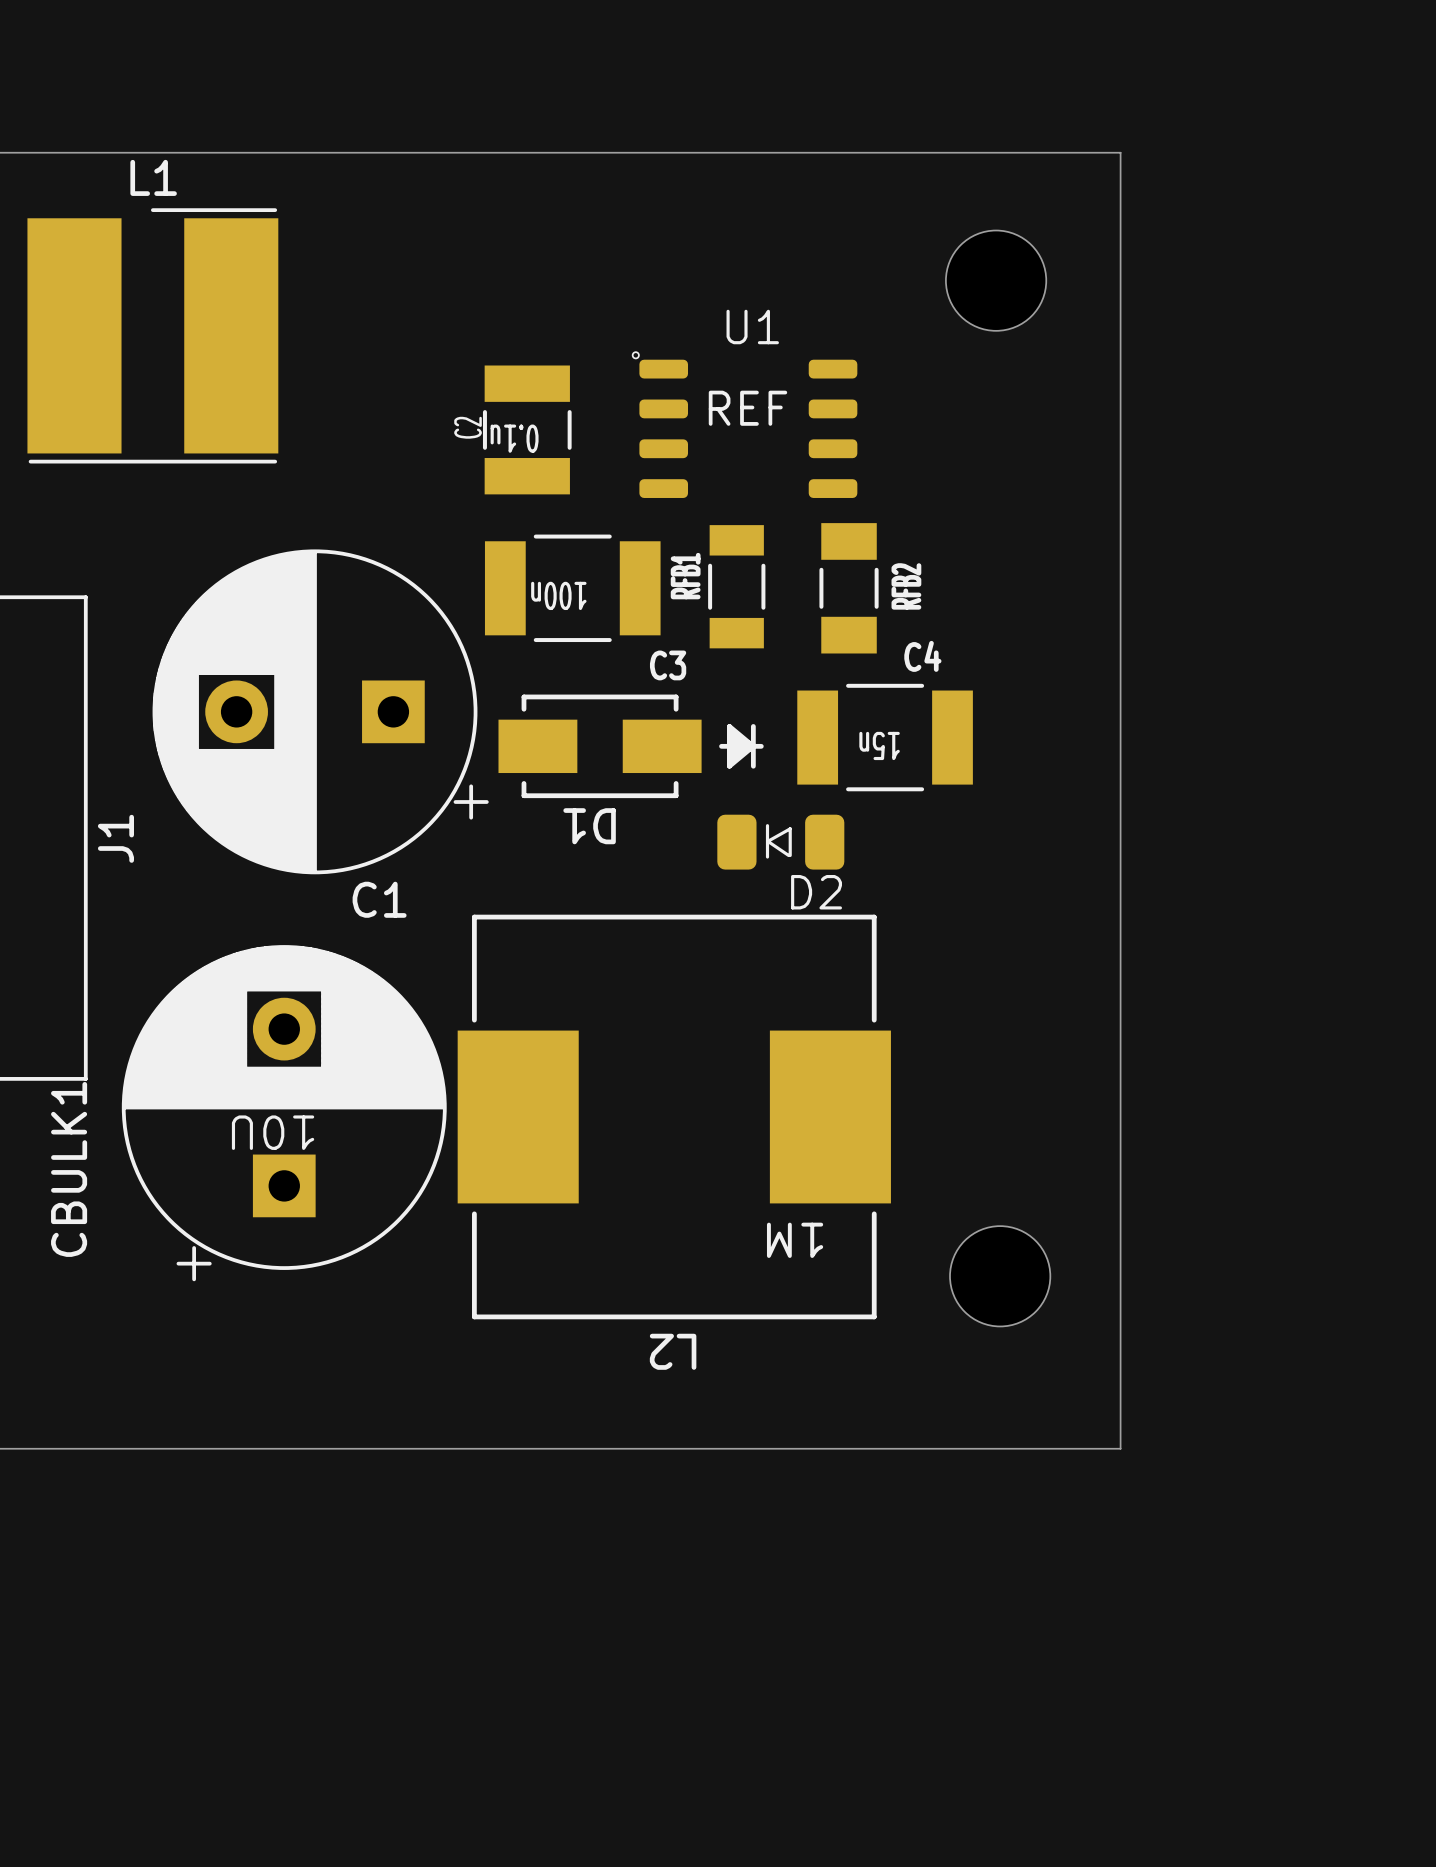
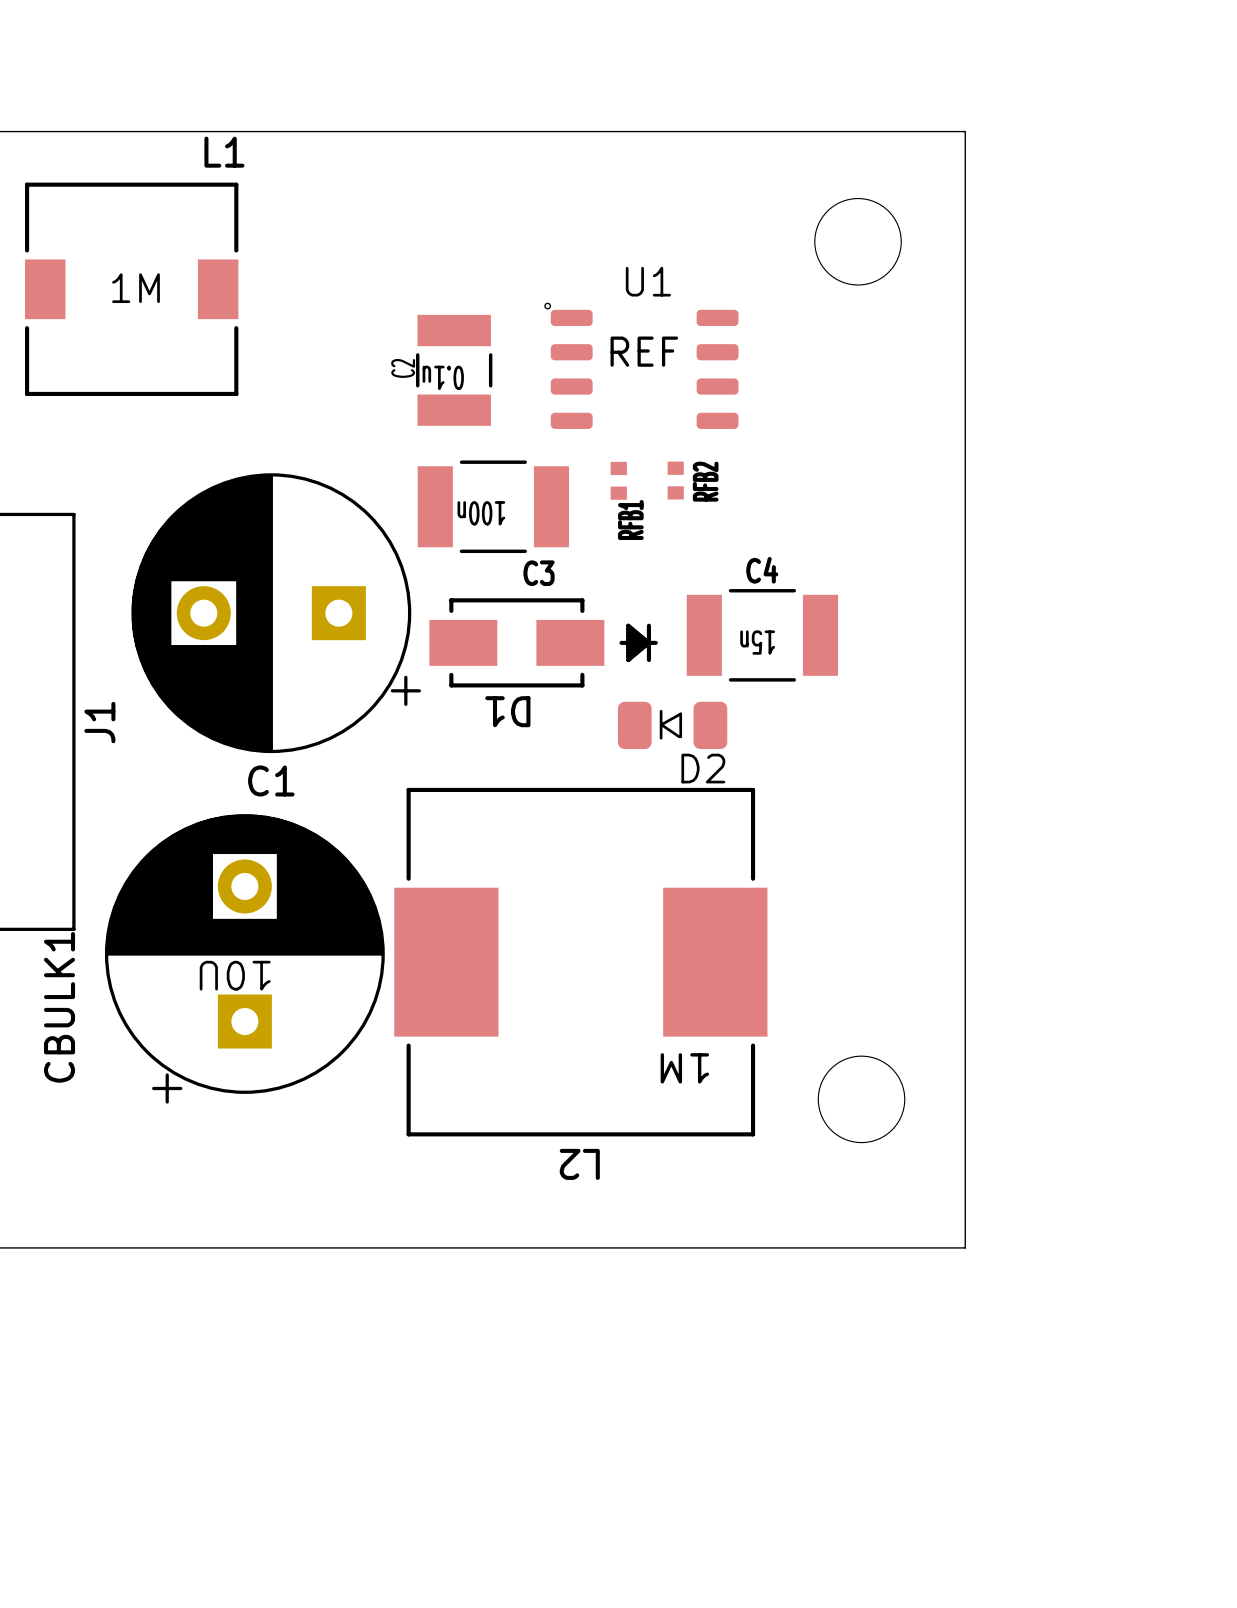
L1 name position: L1 (153, 177) -> L1 (224, 152)
L1 footprint: [27, 208, 279, 464] -> [25, 182, 239, 396]
L1 value: none -> 1M (136, 288)
RFB2 footprint: [819, 523, 879, 654] -> [667, 461, 684, 500]
RFB1 footprint: [708, 525, 766, 649] -> [610, 461, 627, 500]
RFB1 name position: RFB1 (685, 576) -> RFB1 (630, 520)
C4 name position: C4 (922, 656) -> C4 (762, 570)
C3 name position: C3 (668, 665) -> C3 (539, 573)
C1 name position: C1 (379, 899) -> C1 (271, 780)

